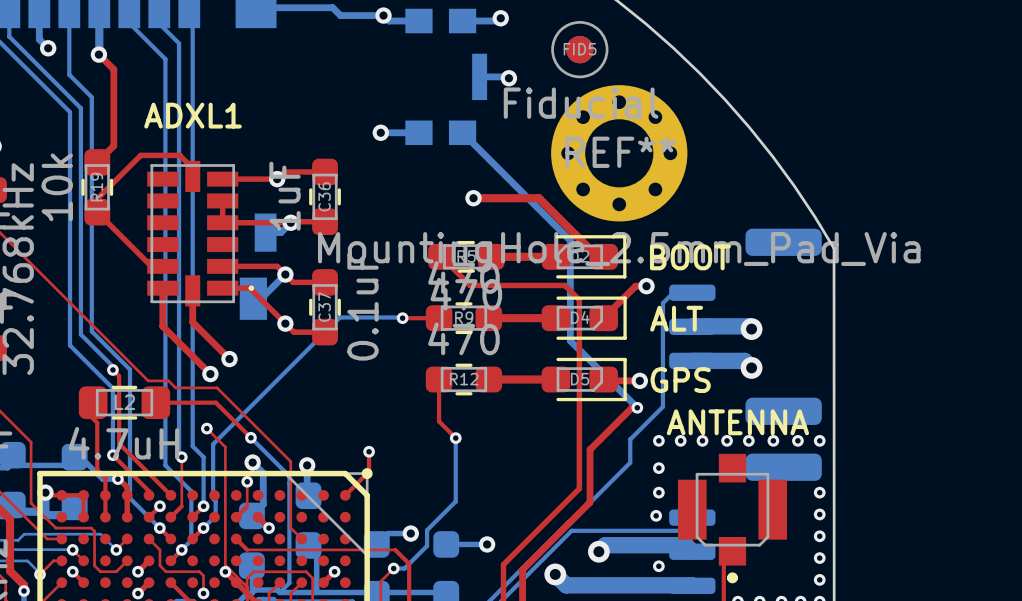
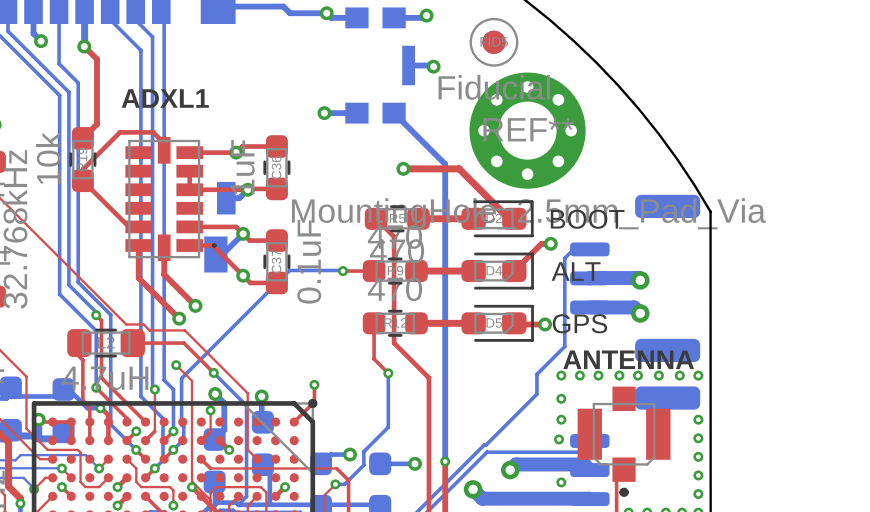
bottom track: (522, 192) (570, 240) (570, 340) (637, 407) -> (445, 164) (445, 461)
top track: (462, 277) (470, 285) (564, 285) (579, 299) (579, 488) (503, 564) -> (394, 236) (394, 343) (428, 377) (428, 480)
top track: (637, 407) (631, 407) (590, 449) (590, 502) (522, 569) -> (445, 461) (445, 485)
via: (637, 407) -> none
via: none -> (445, 461)

